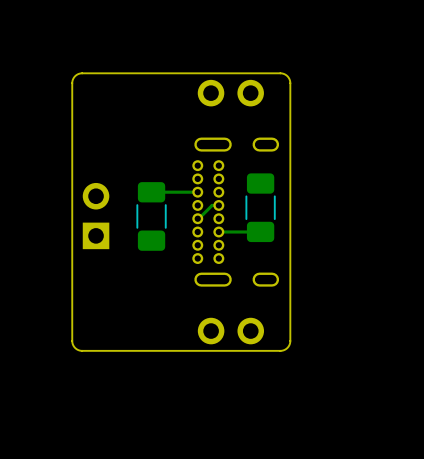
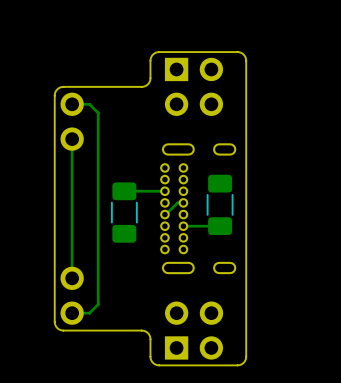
part: none -> (193, 69)
board edge: (171, 73) (281, 73) (288, 77) (290, 83) -> (141, 86) (149, 81) (150, 58) (156, 52) (238, 52) (243, 54) (245, 58) (246, 95)
track: none -> (72, 104) (89, 104) (98, 112) (98, 304) (89, 313) (72, 313)
part: none -> (72, 121)
track: none -> (72, 139) (72, 278)
part: (96, 216) -> none
part: none -> (72, 295)
board edge: (290, 340) (288, 347) (281, 350) (171, 350) -> (246, 321) (245, 358) (242, 363) (238, 365) (156, 364) (150, 358) (149, 335) (141, 330)
part: none -> (193, 347)

